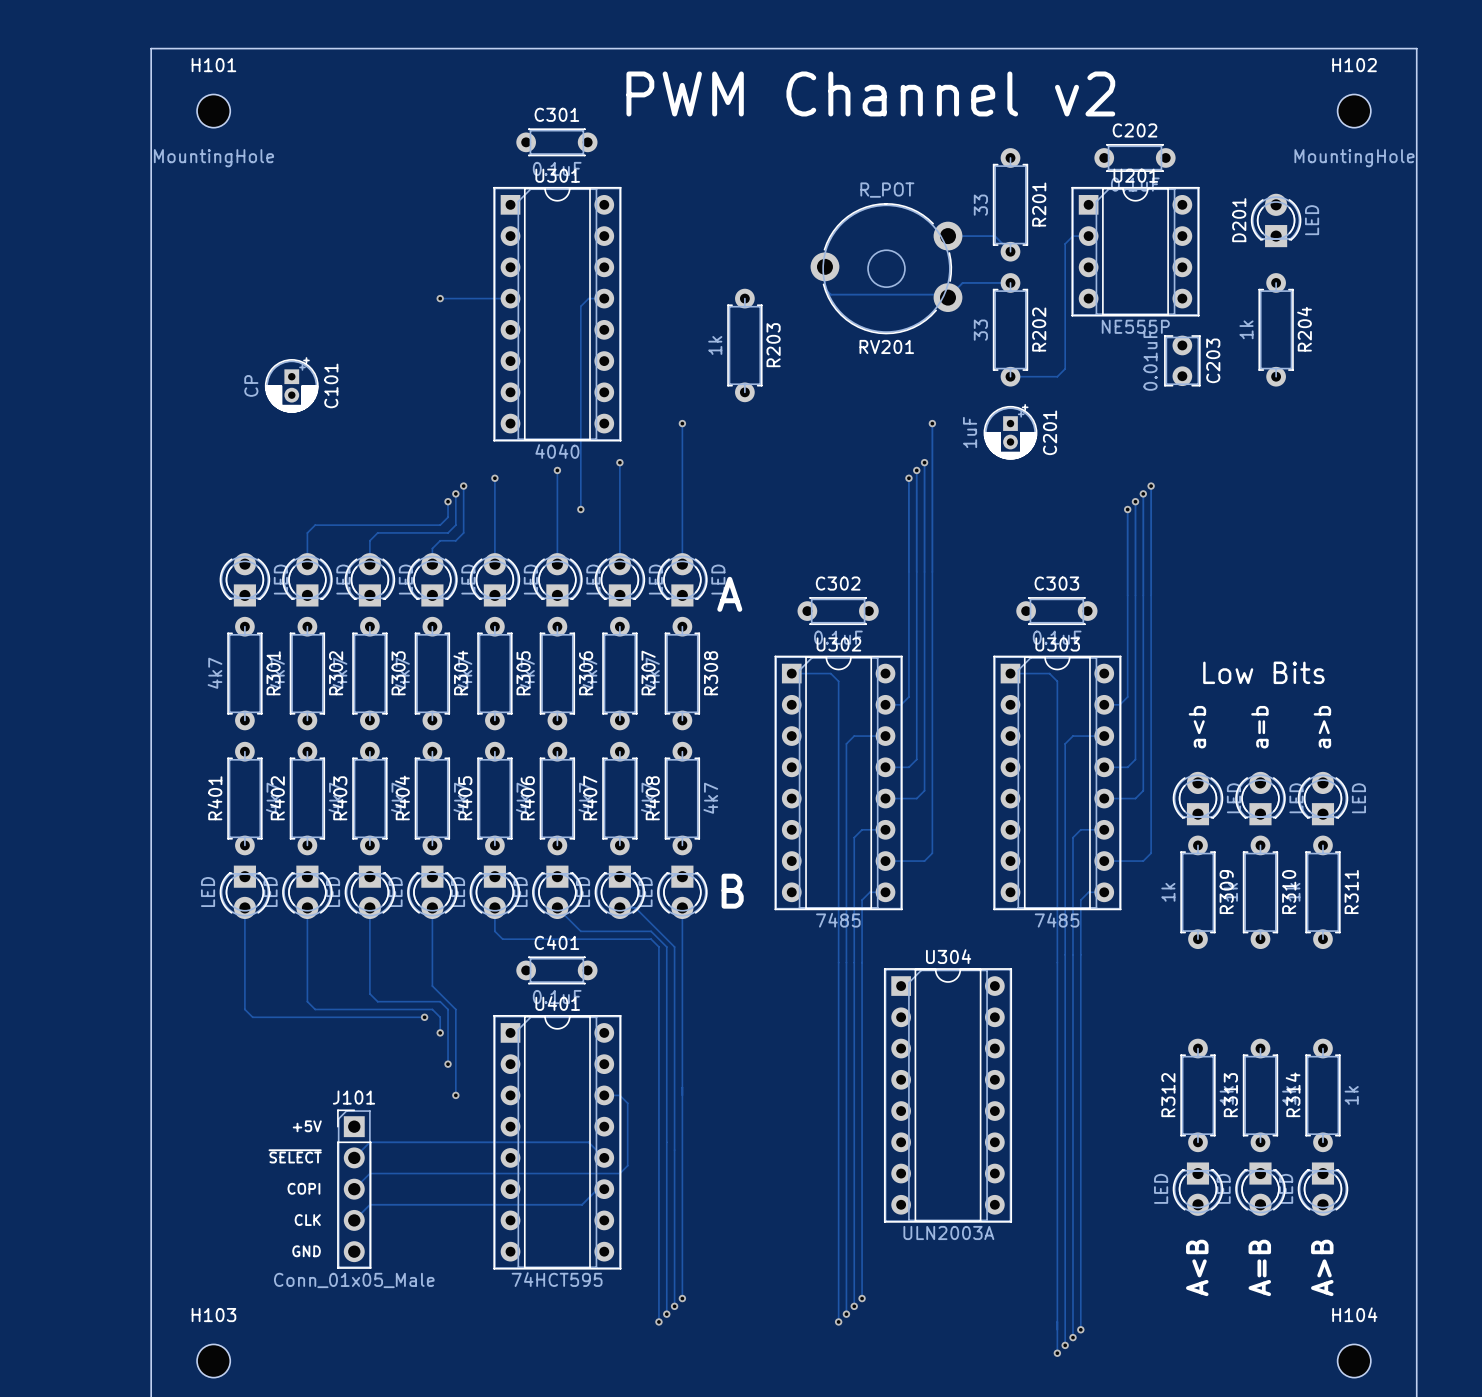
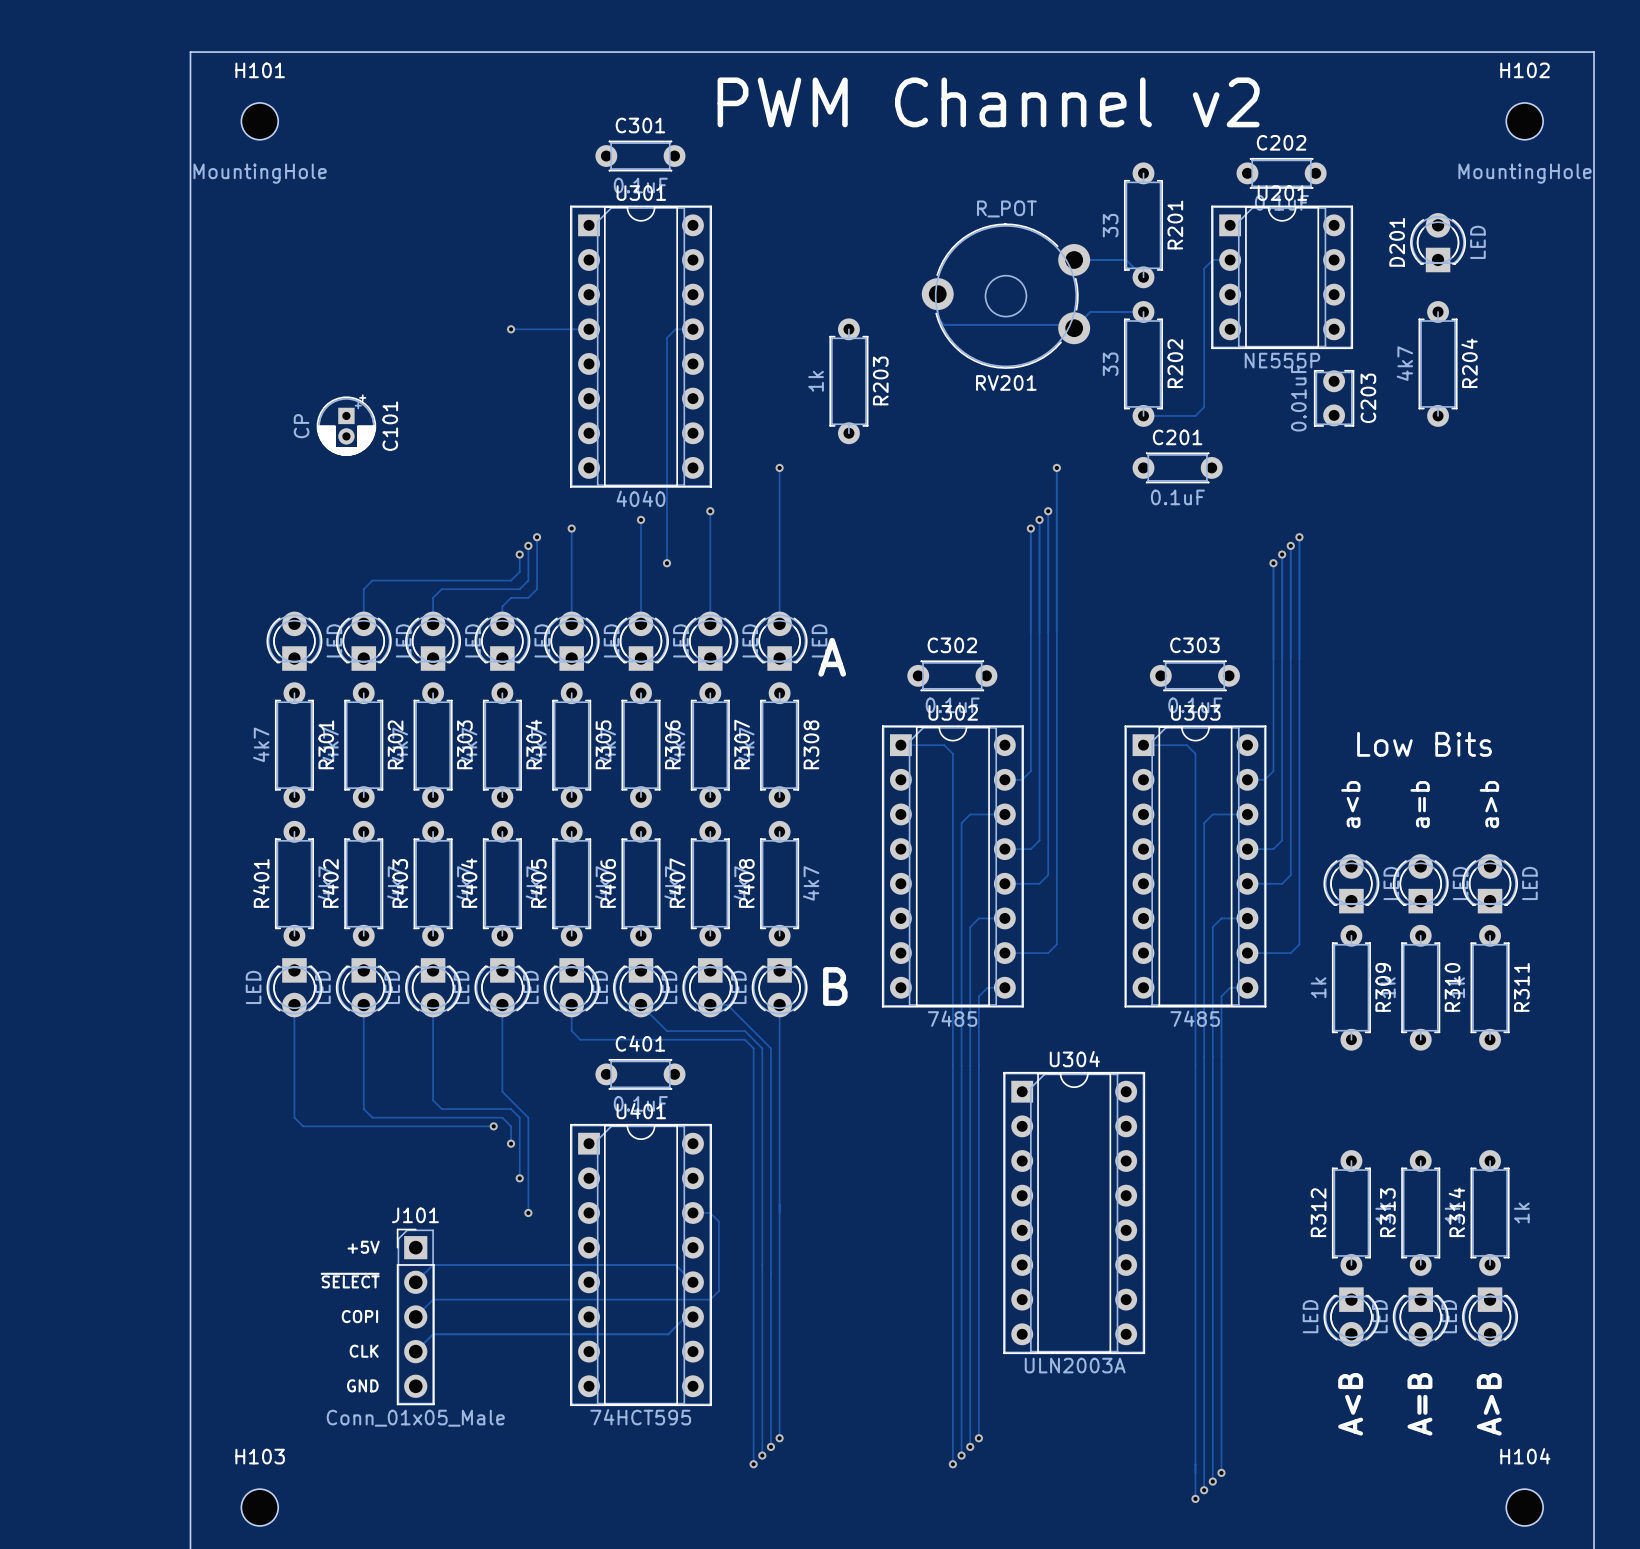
R204 value: 1k (1246, 329) -> 4k7 (1404, 363)
C201 footprint: [983, 404, 1038, 460] -> [1132, 452, 1223, 484]
C201 value: 1uF (970, 432) -> 0.1uF (1177, 497)
C201 name position: C201 (1050, 432) -> C201 (1177, 437)

